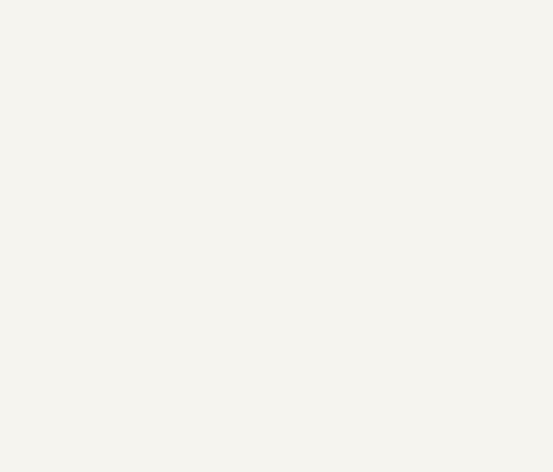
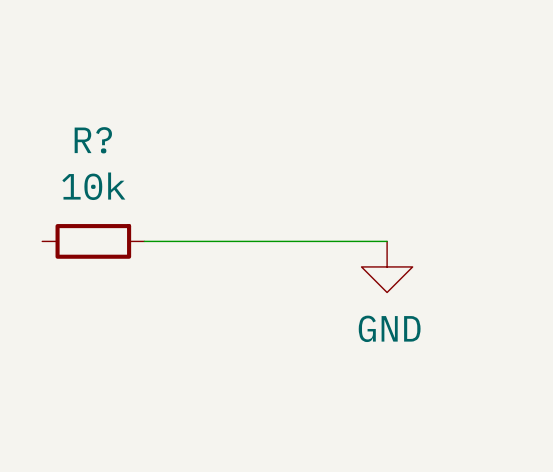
R?: none -> 10k (93, 241)
wire: none -> (144, 241) (387, 241)
power symbol: none -> GND (387, 266)

